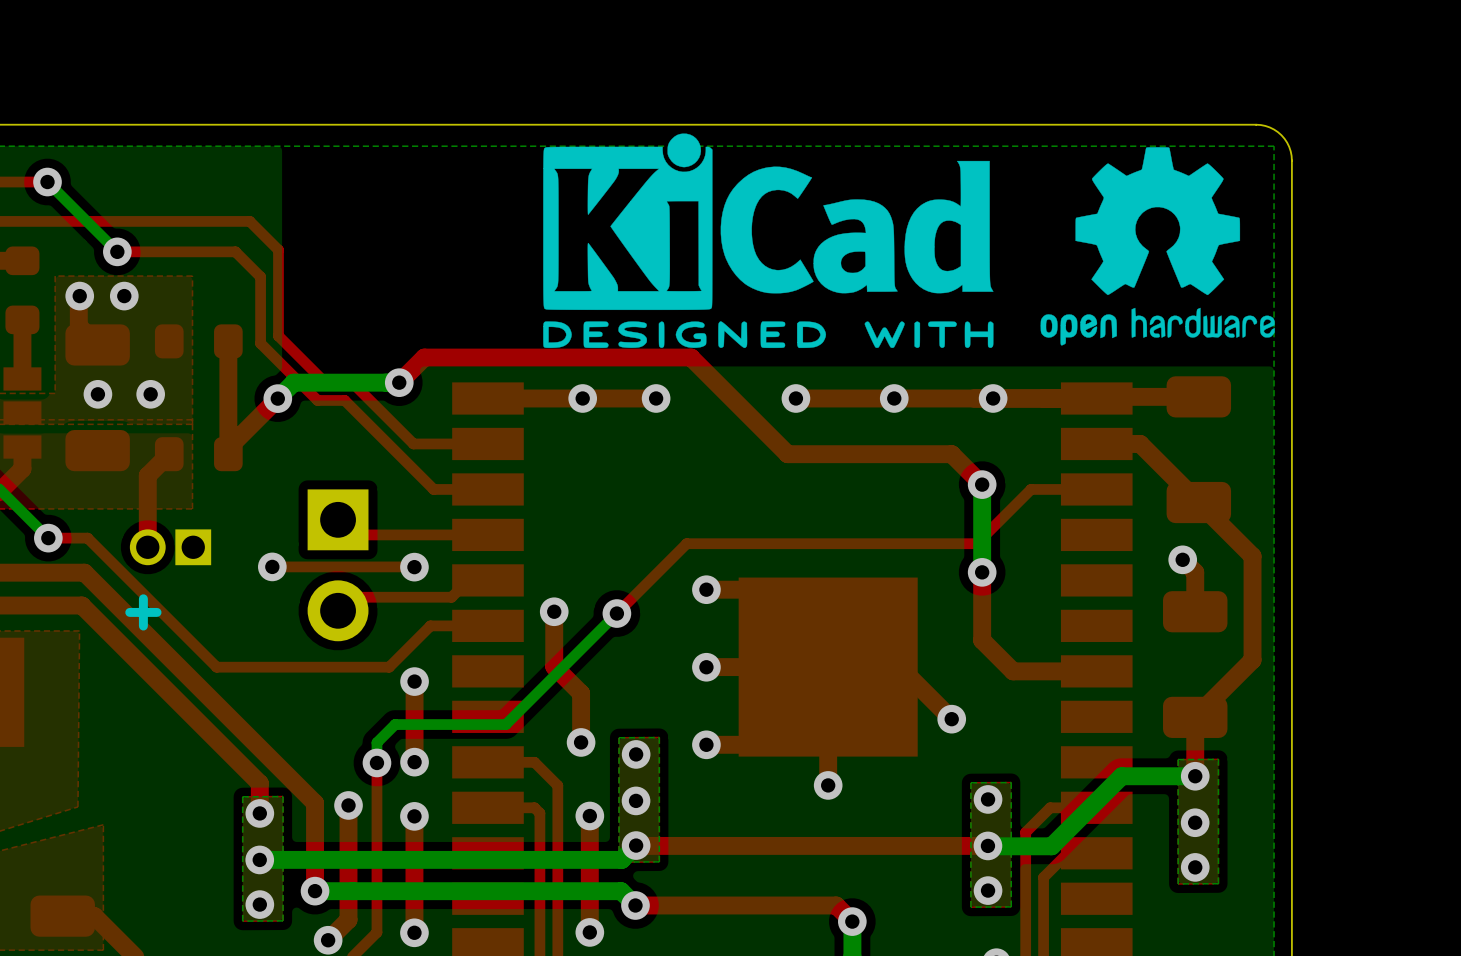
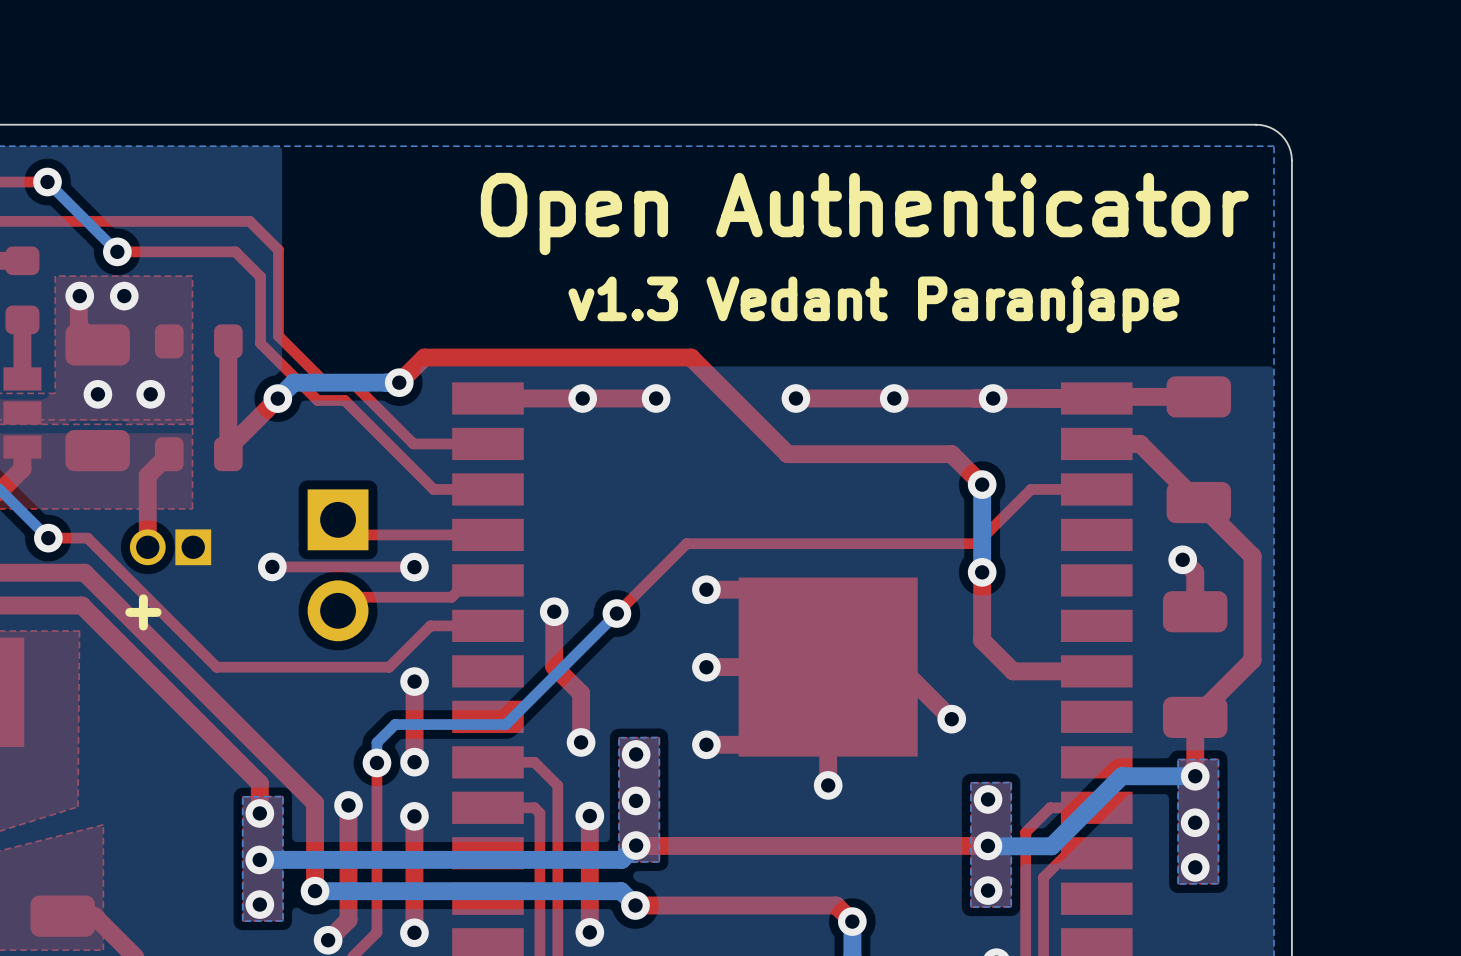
drawing: [543, 133, 994, 349] -> none
drawing: [1040, 147, 1275, 346] -> none
text: none -> Open Authenticator (864, 214)
text: none -> v1.3 Vedant Paranjape (873, 304)

